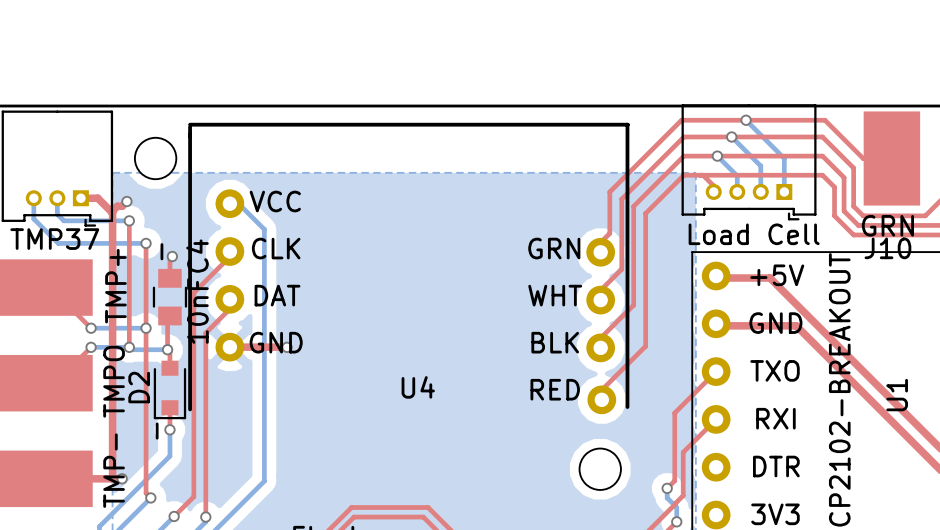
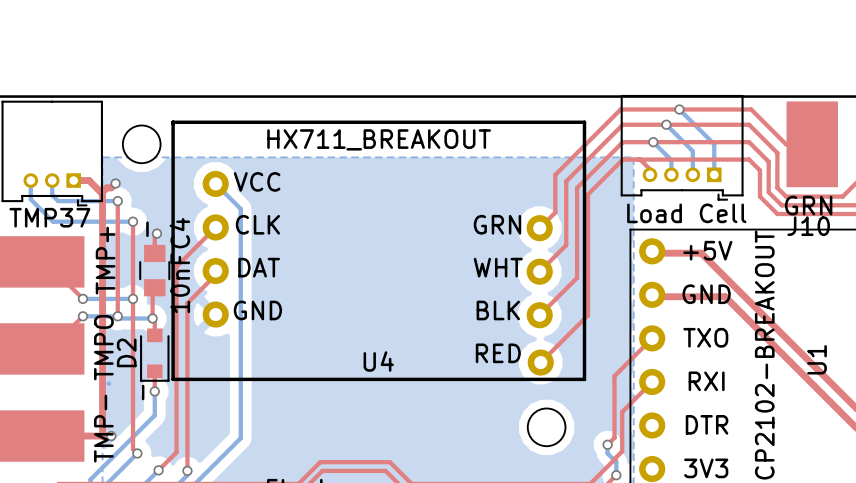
line: (190, 124) (627, 124) -> none
line: (627, 124) (627, 407) -> none
line: (190, 127) (190, 134) -> (173, 372) (173, 379) (584, 379) (584, 122) (173, 122)
U4 value: none -> HX711_BREAKOUT (379, 139)
U4 footprint: [215, 189, 617, 415] -> [202, 170, 554, 376]
top track: (229, 347) (286, 347) -> none
via: (287, 347) -> none
bottom track: none -> (108, 383) (109, 383)

